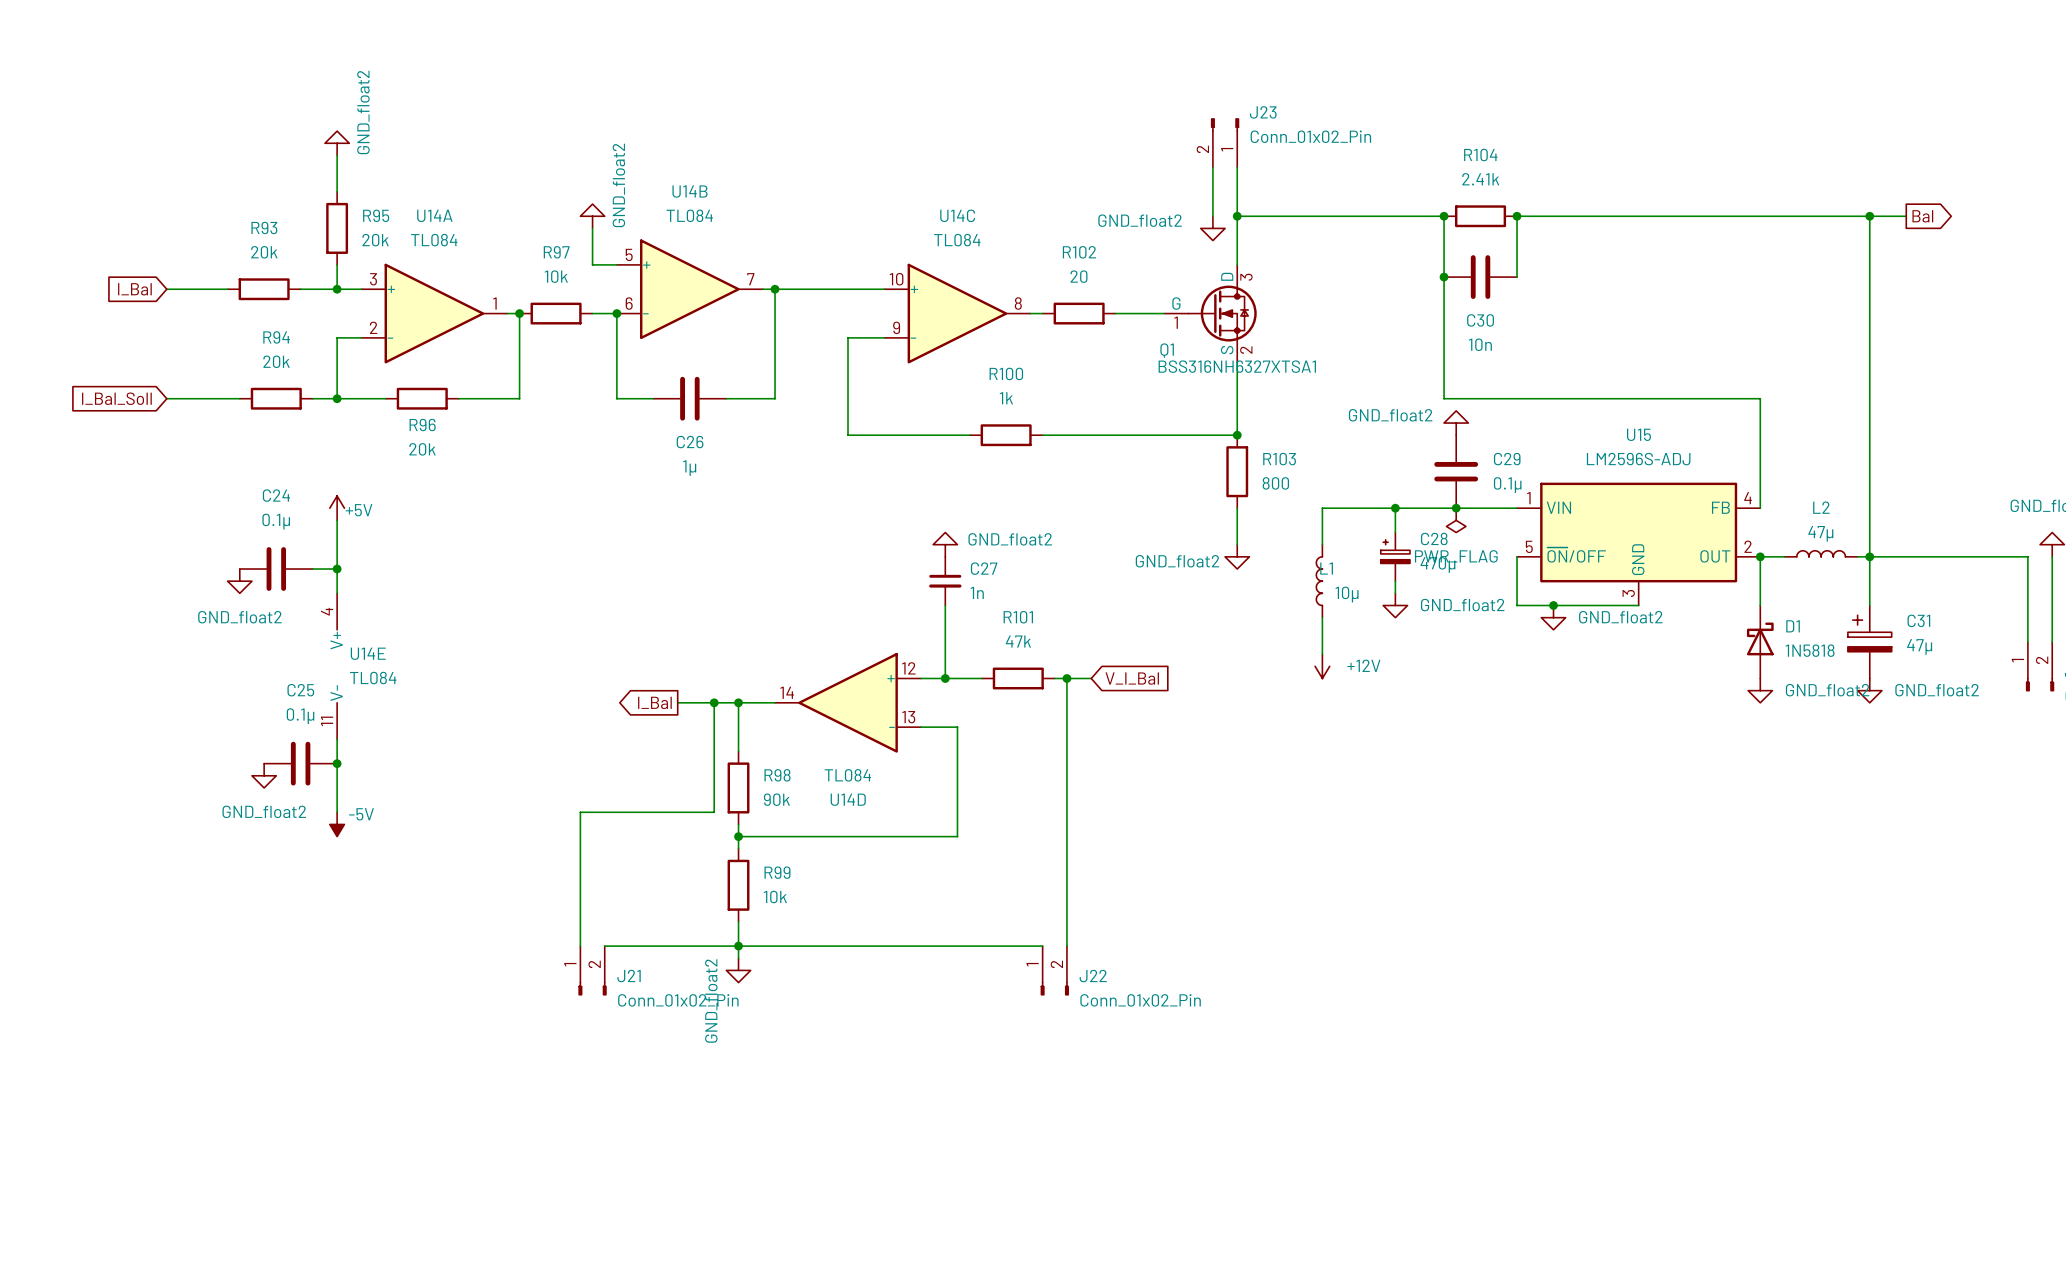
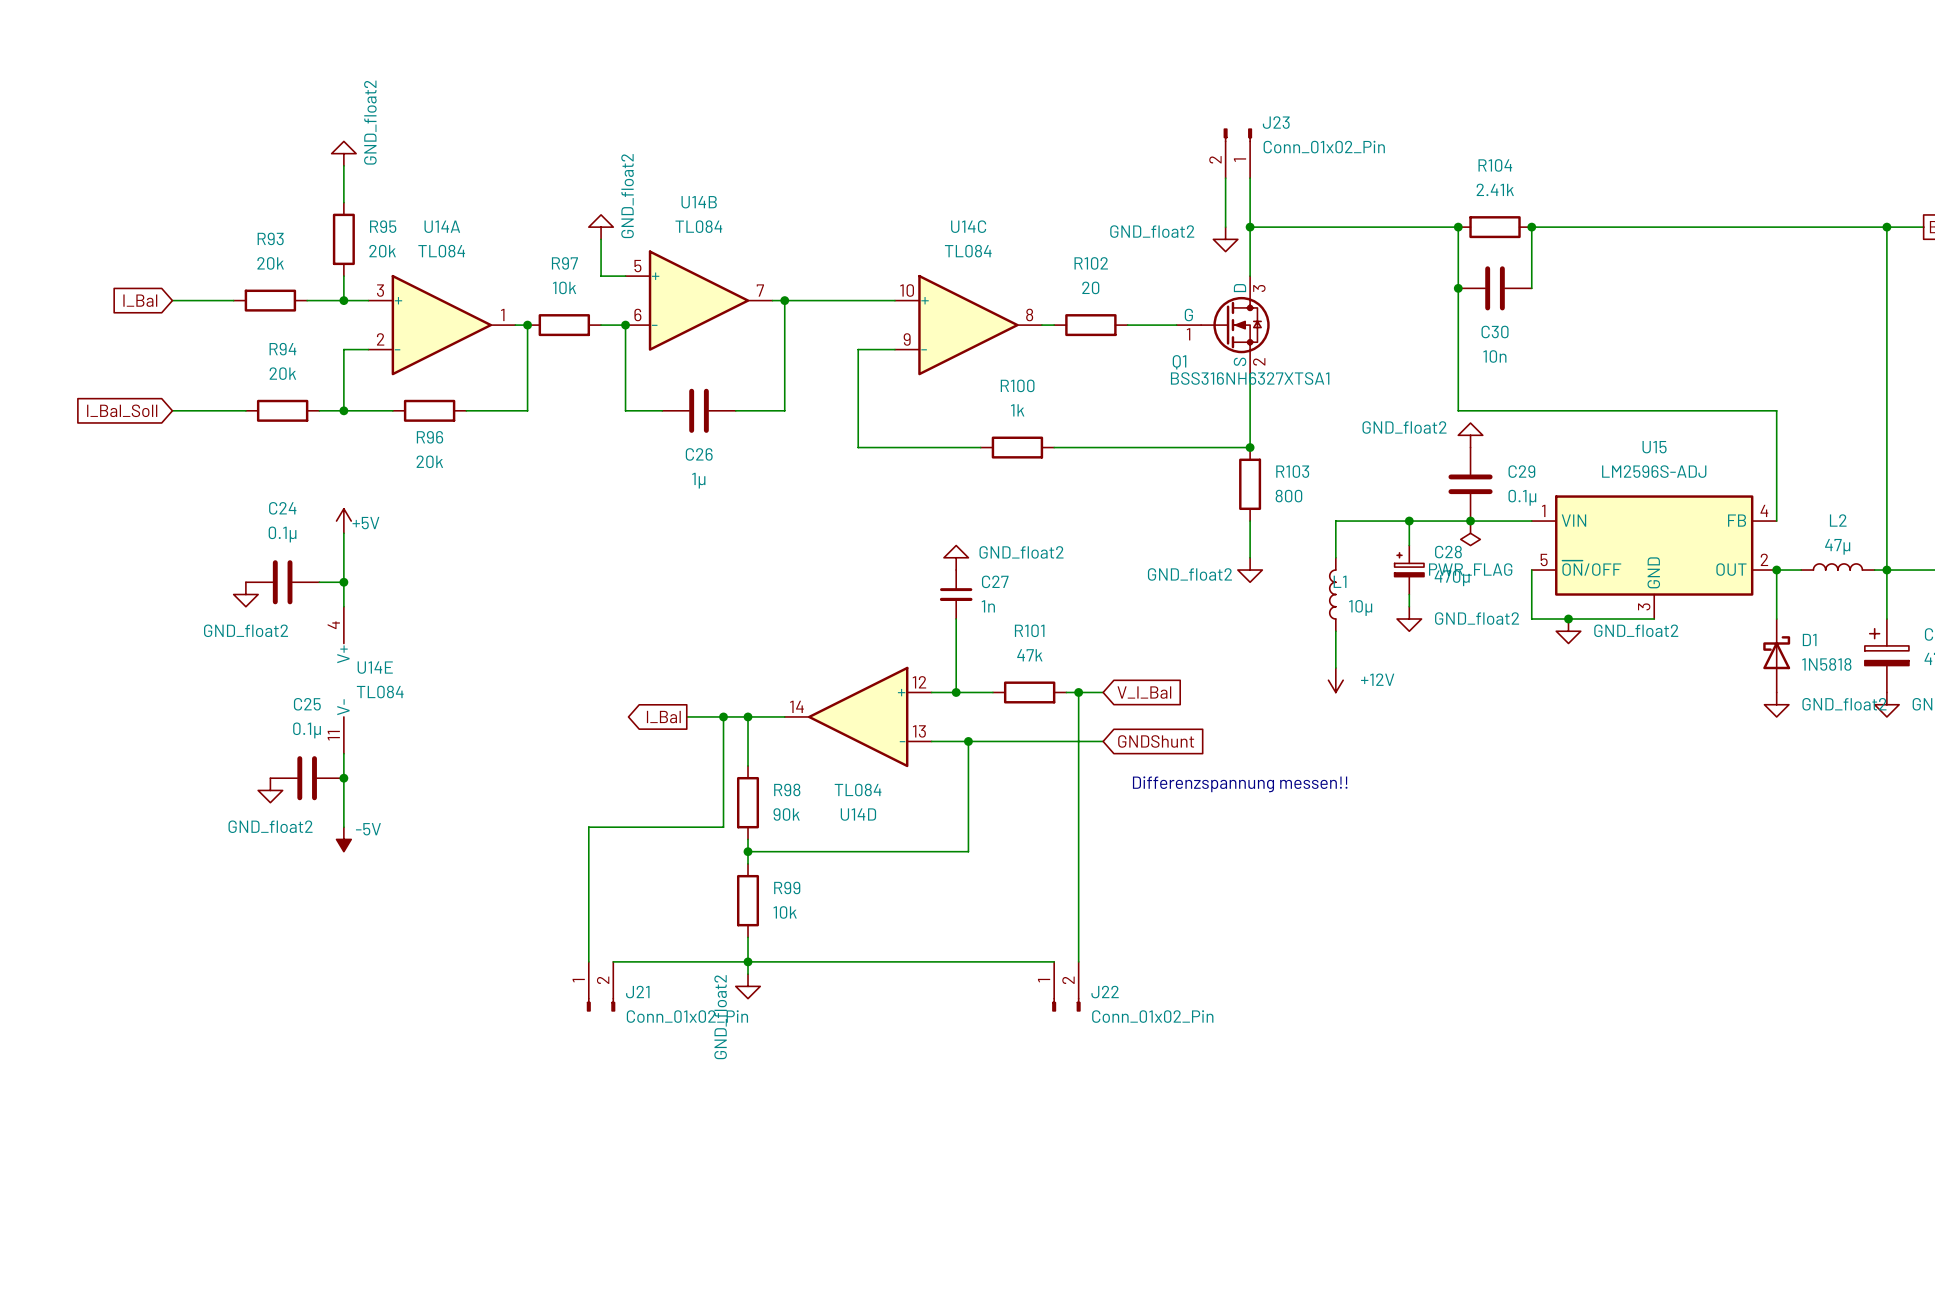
wire: none -> (968, 741) (1103, 741)
junction: none -> (968, 741)
global label: none -> GNDShunt (1156, 741)
text: none -> Differenzspannung messen!! (1240, 784)

